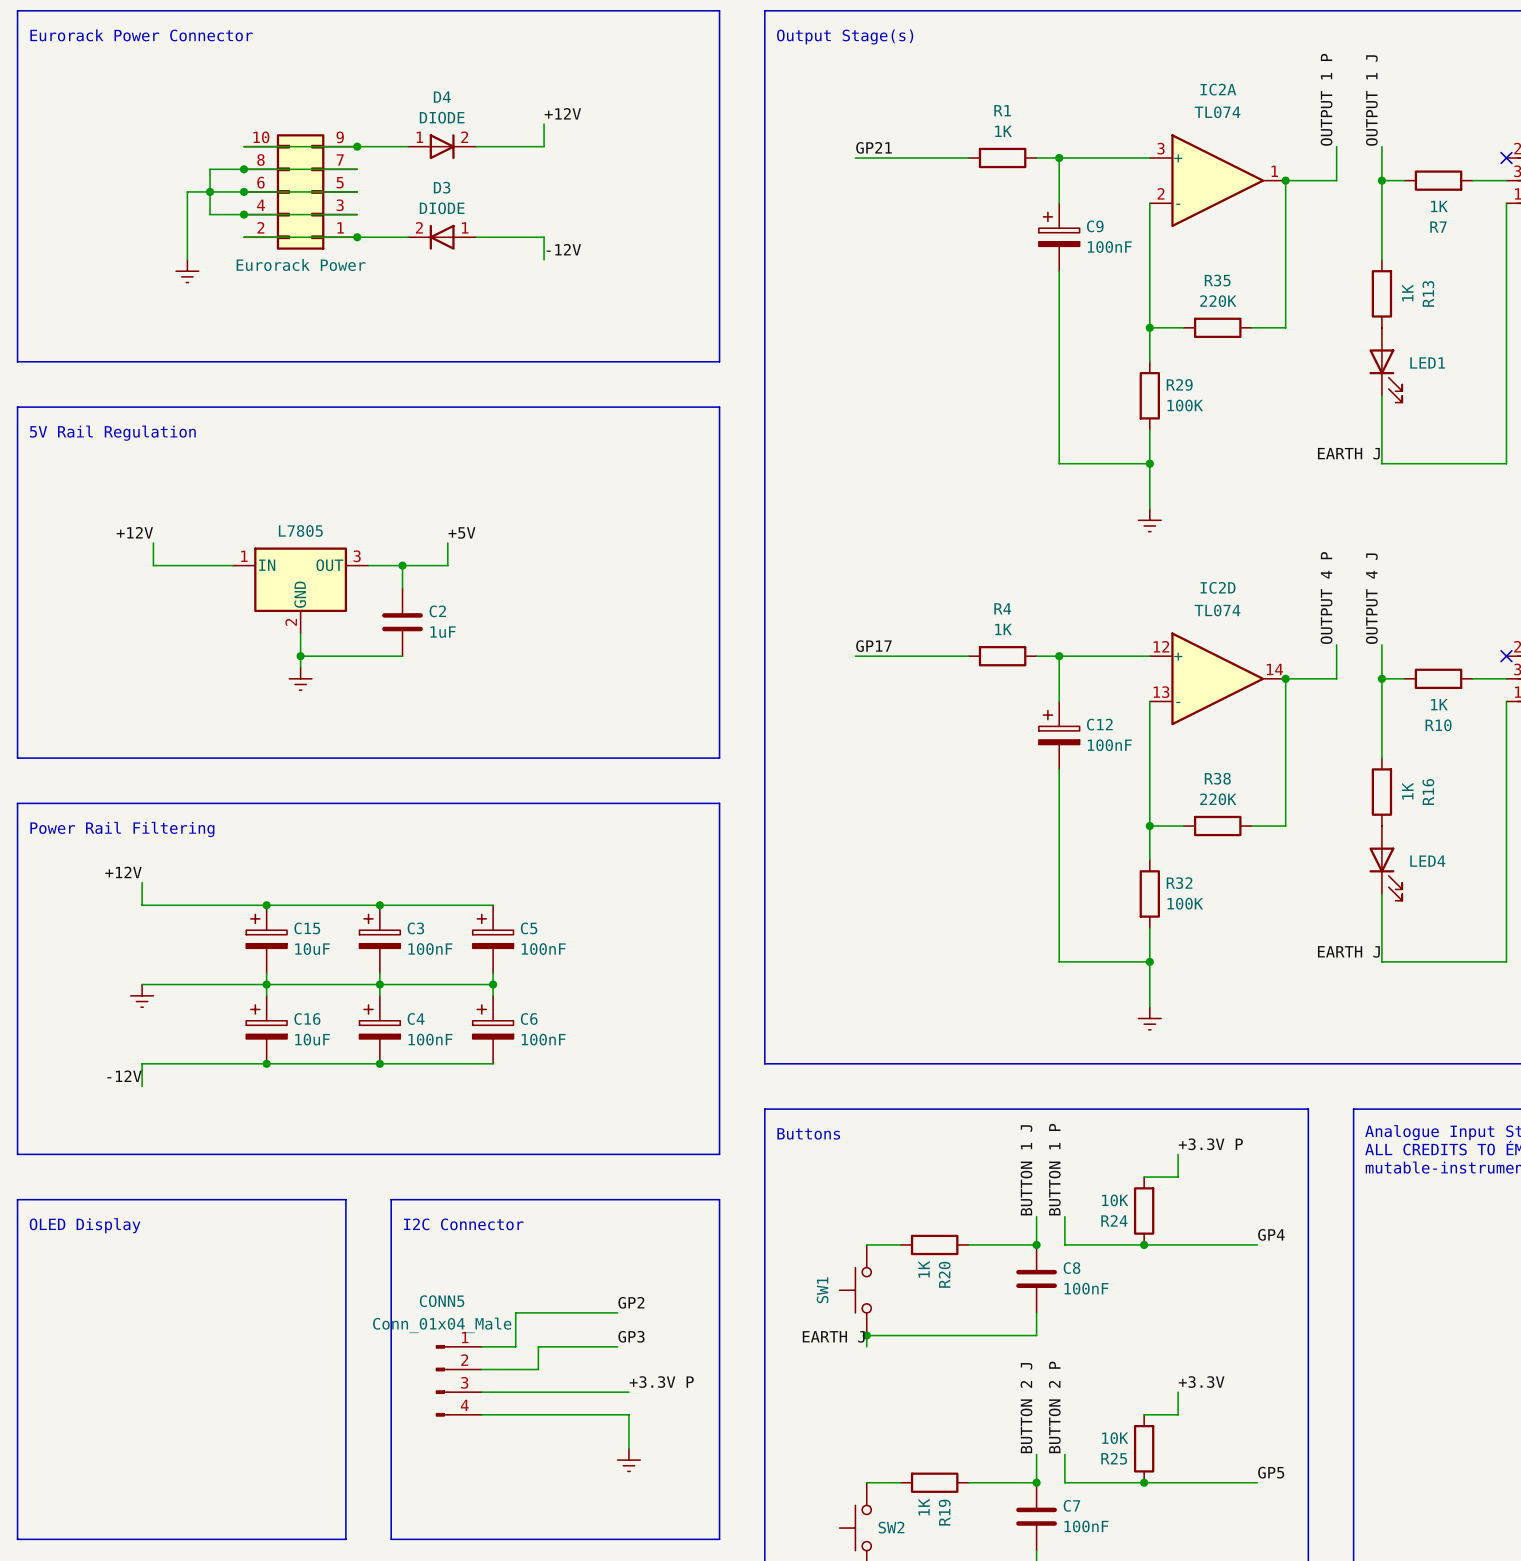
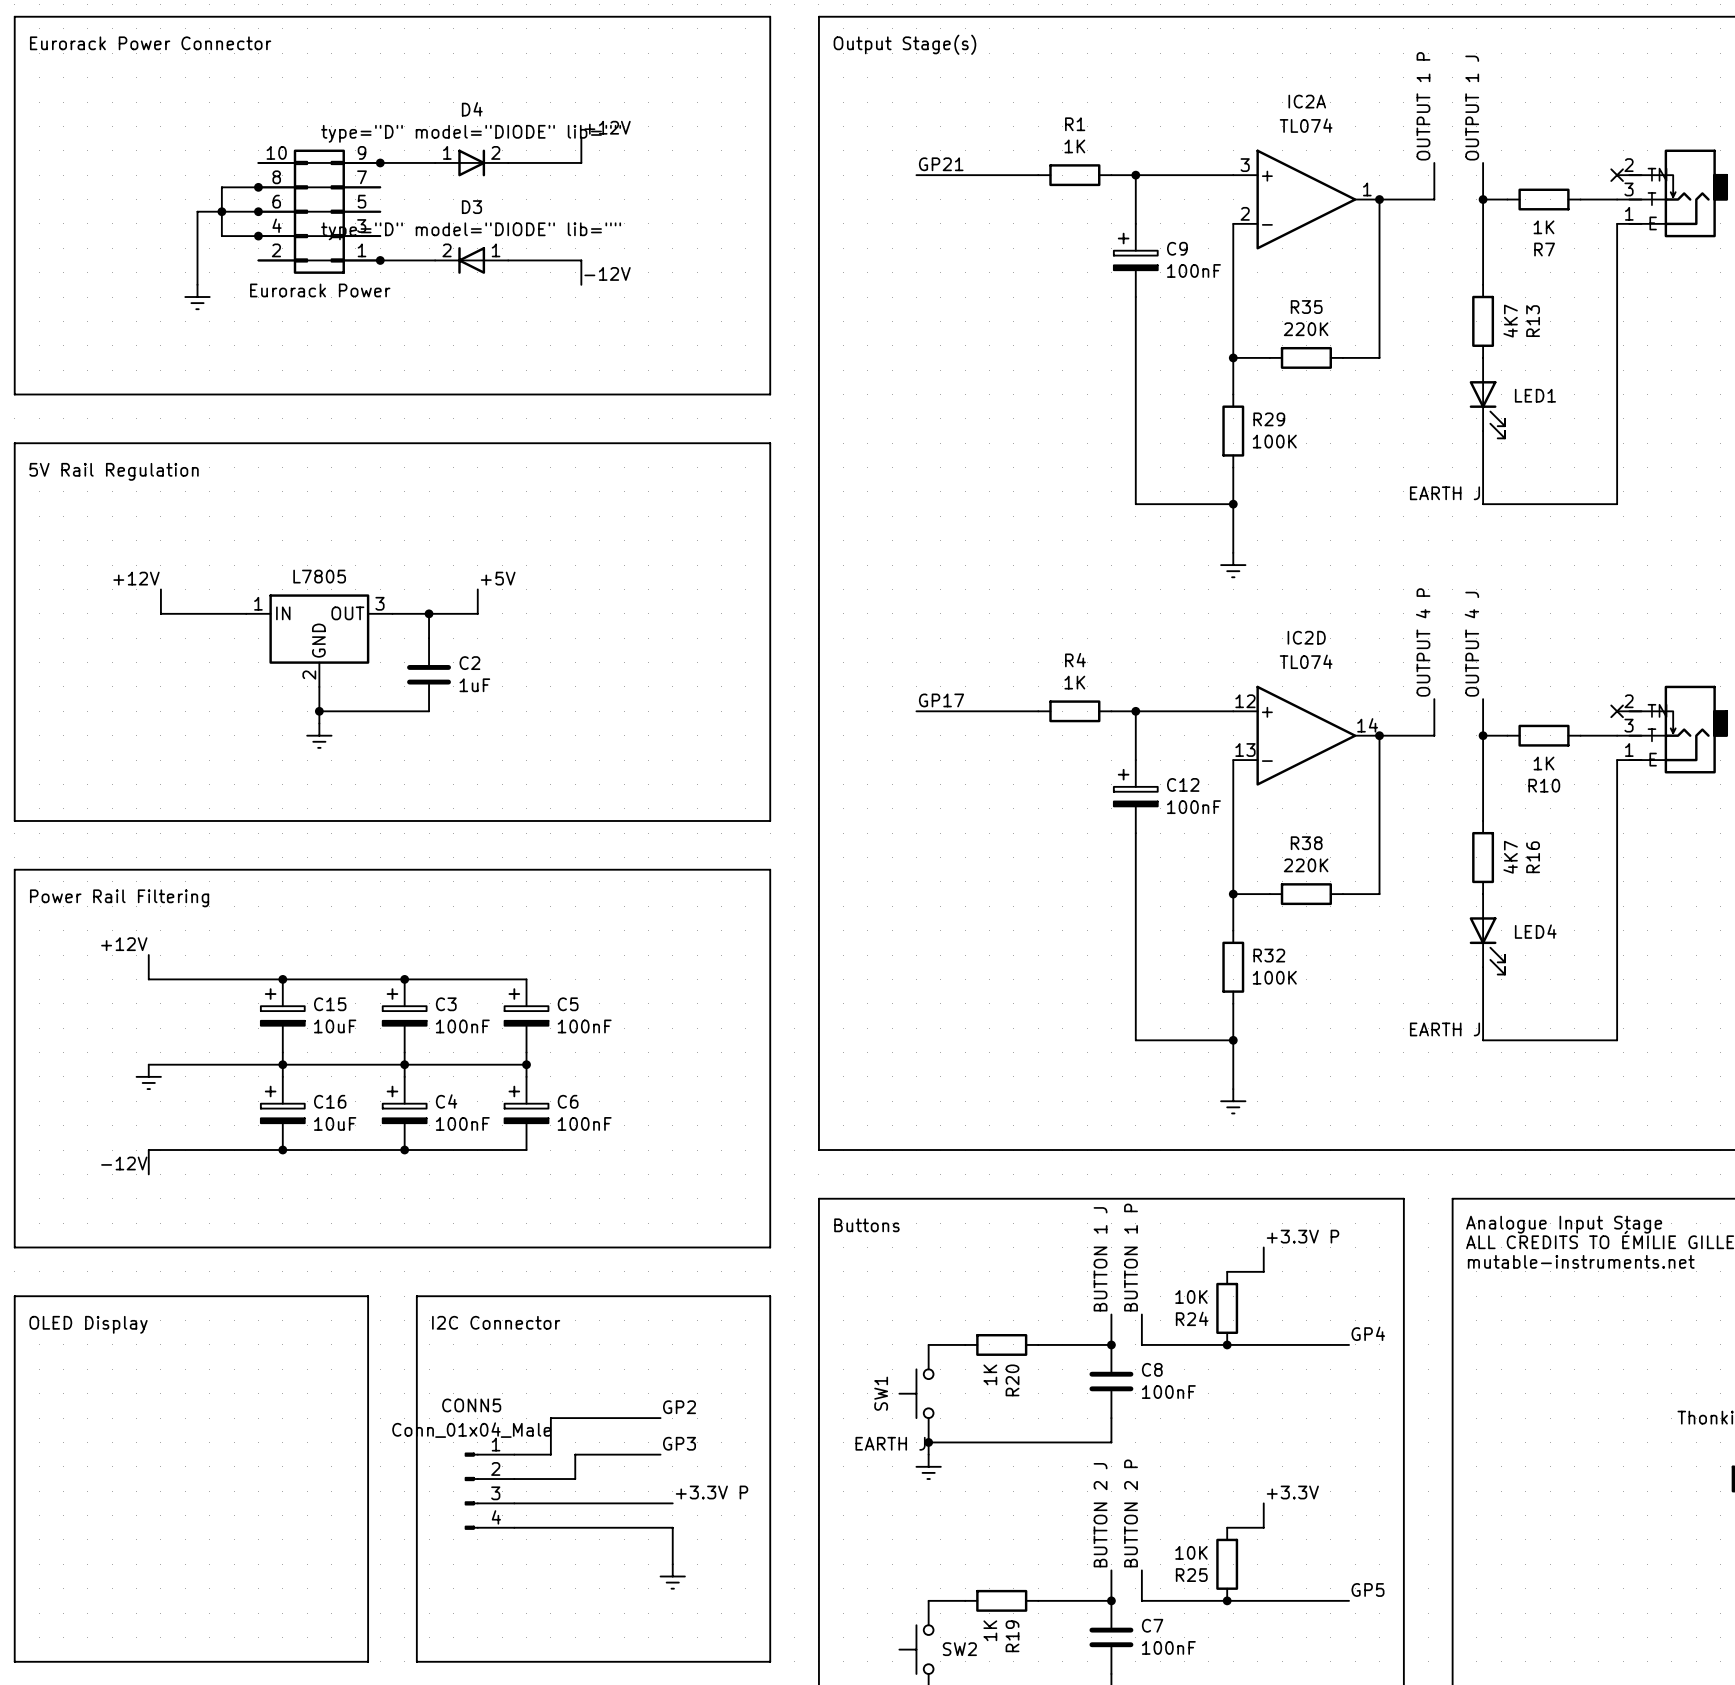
D4 value: DIODE (442, 117) -> type="D" model="DIODE" lib="" (471, 133)
D3 value: DIODE (442, 208) -> type="D" model="DIODE" lib="" (471, 231)
R13 value: 1K (1407, 292) -> 4K7 (1510, 321)
R16 value: 1K (1407, 791) -> 4K7 (1510, 857)
power symbol: none -> (928, 1466)

